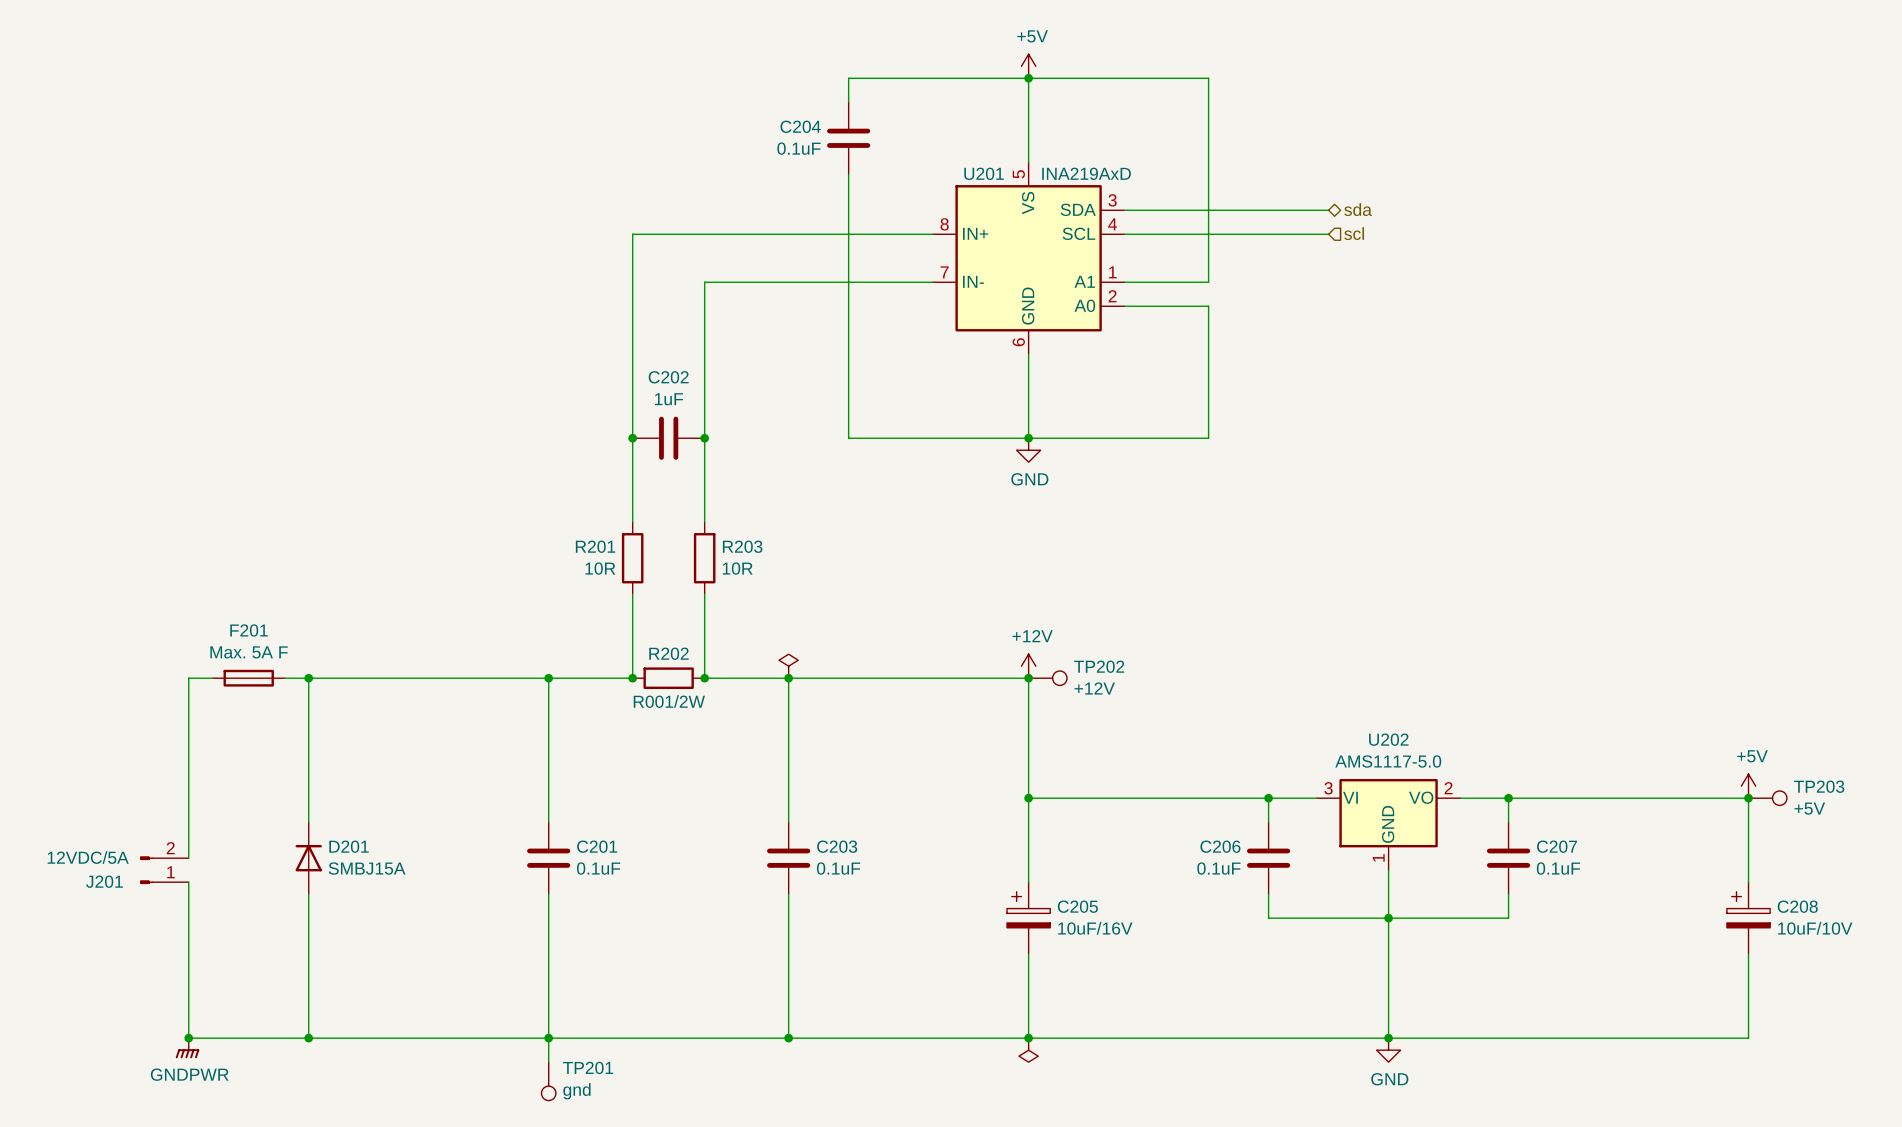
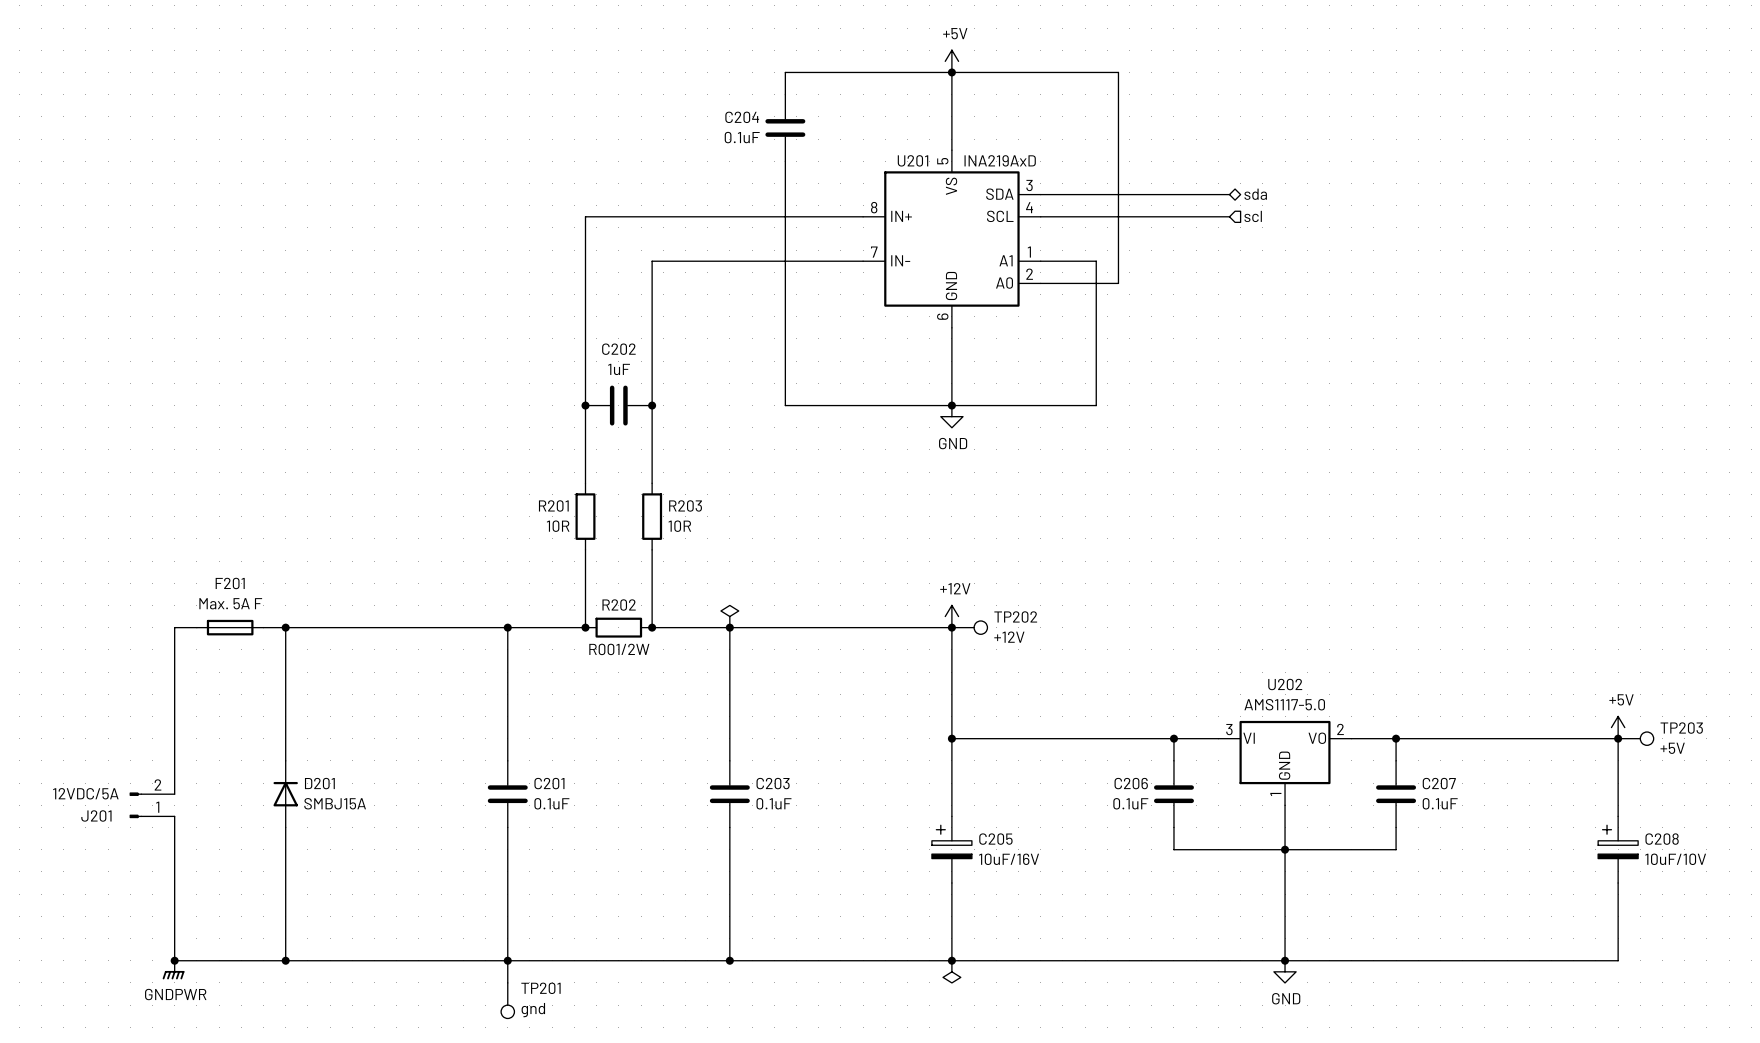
wire: (1184, 282) (1208, 282) -> (1118, 283) (1118, 261)
wire: (1208, 306) (1208, 438) (1184, 438) -> (1096, 261) (1096, 405)

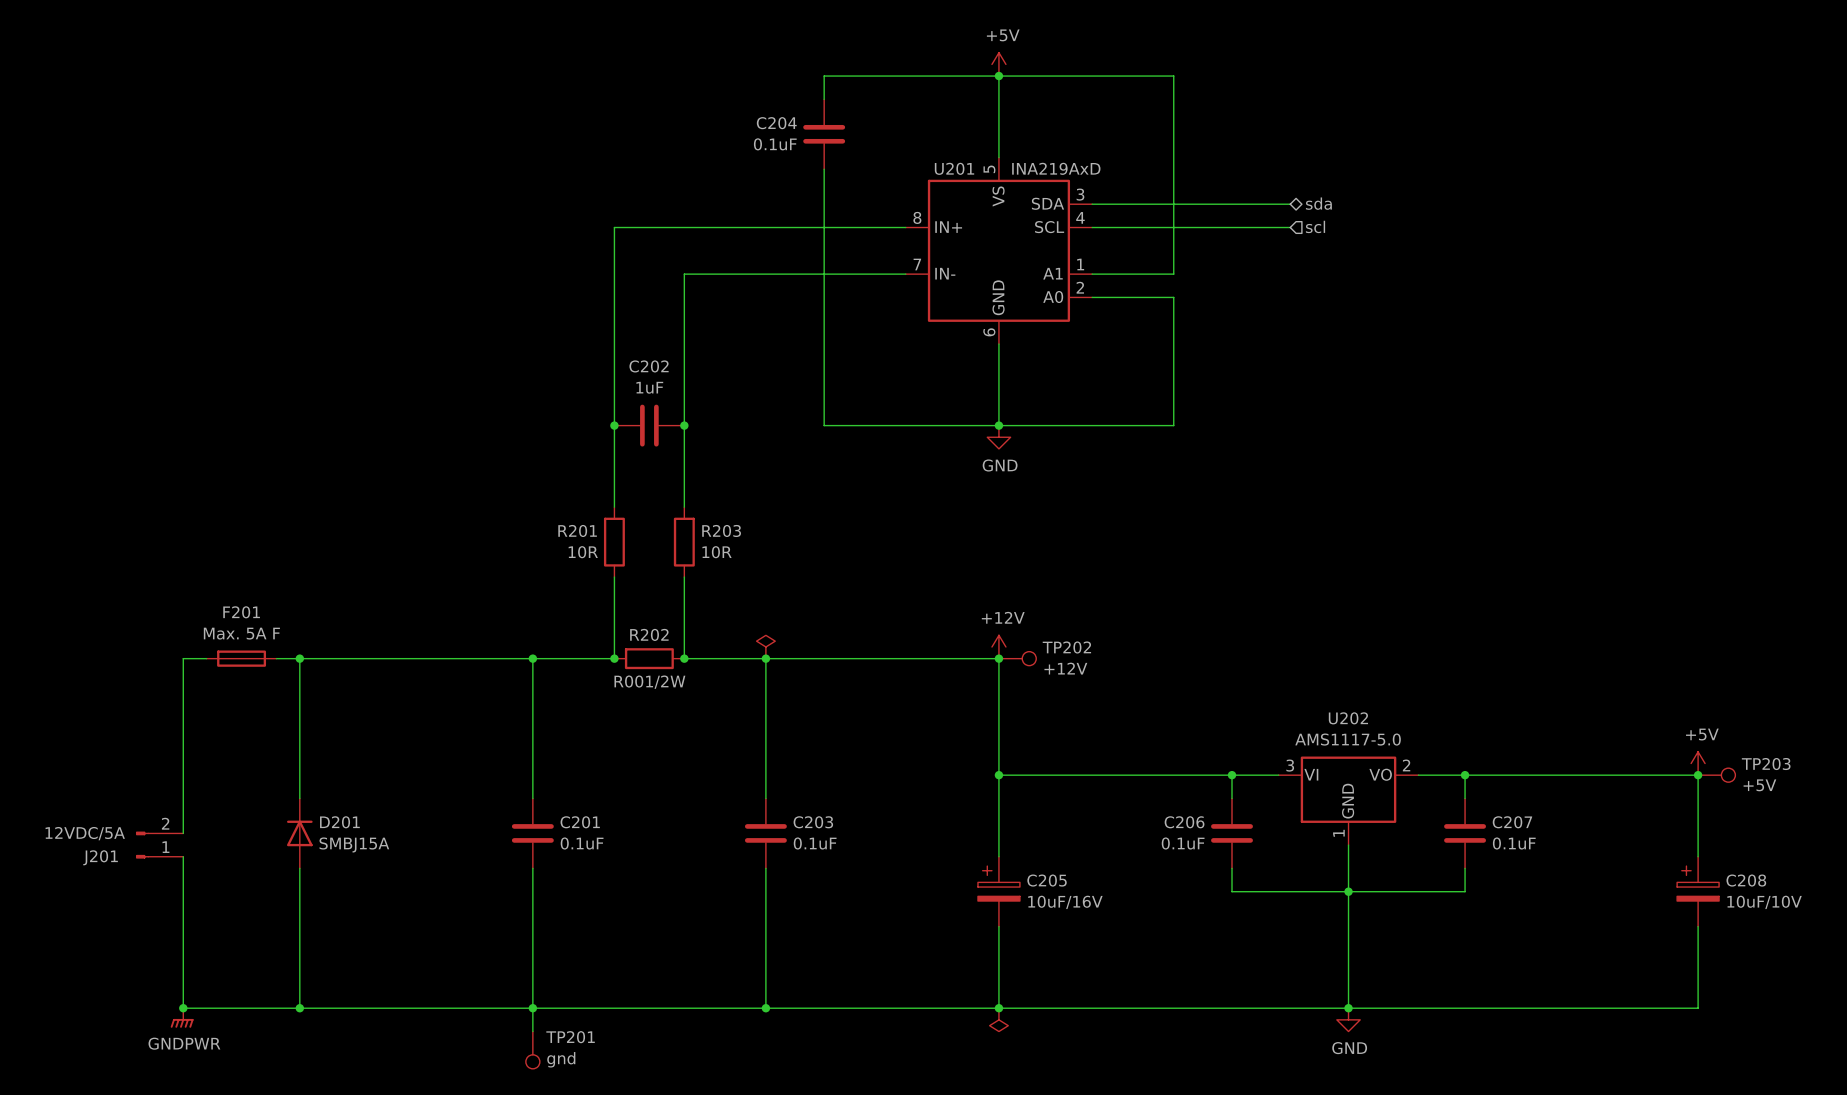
wire: (1096, 261) (1096, 405) -> (1173, 297) (1173, 425) (1150, 425)
wire: (1118, 261) (1118, 283) -> (1173, 274) (1150, 274)

